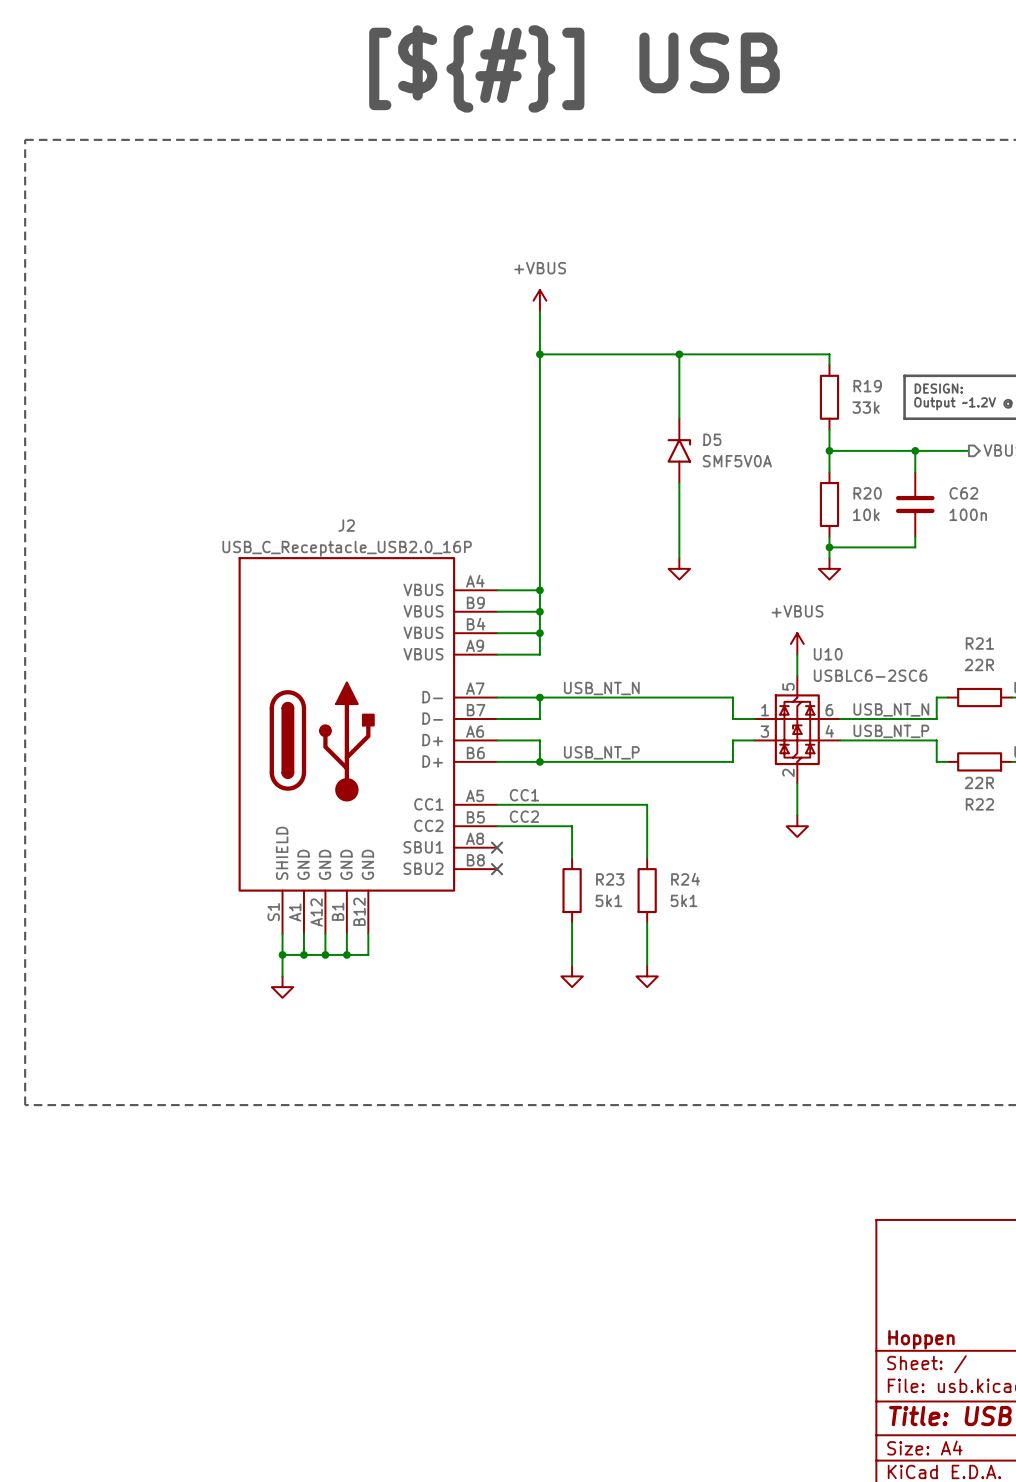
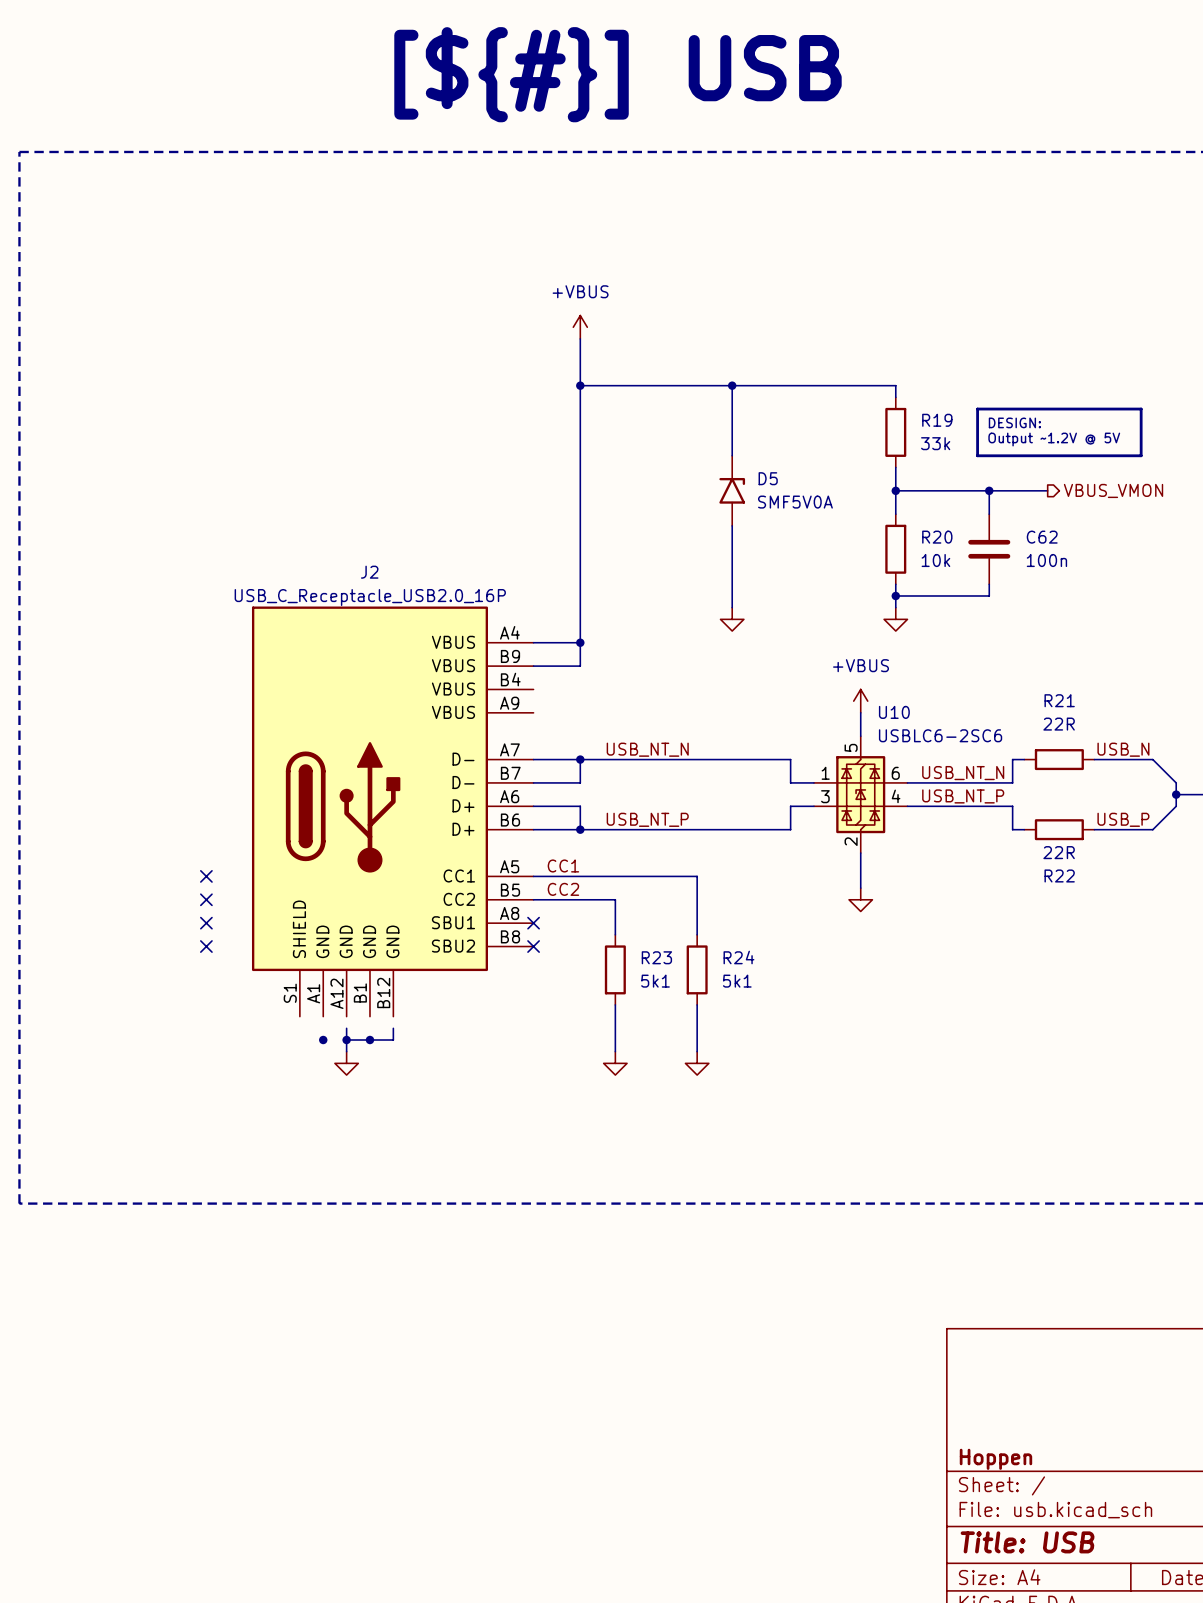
wire: (539, 611) (539, 654) (497, 654) -> none
junction: (539, 611) -> none
wire: (497, 633) (539, 633) -> none
junction: (539, 633) -> none
no-connect mark: none -> (206, 876)
no-connect mark: none -> (206, 899)
no-connect mark: none -> (206, 923)
no-connect mark: none -> (206, 946)
wire: (282, 933) (282, 976) -> none
wire: (303, 933) (303, 954) -> none
wire: (325, 933) (325, 944) -> none
wire: (346, 933) (346, 954) -> none
wire: (368, 933) (368, 944) -> none
wire: (282, 954) (325, 954) -> (346, 1051) (346, 1040)
junction: (282, 954) -> none
power symbol position: (282, 987) -> (346, 1063)

